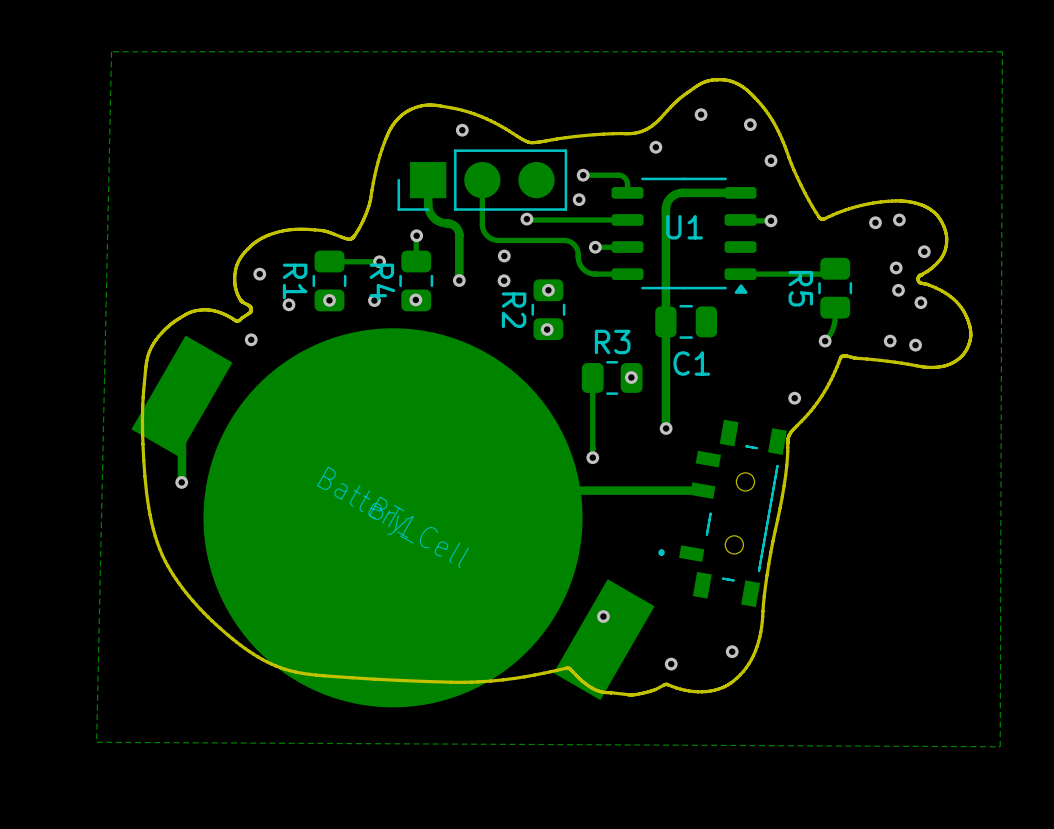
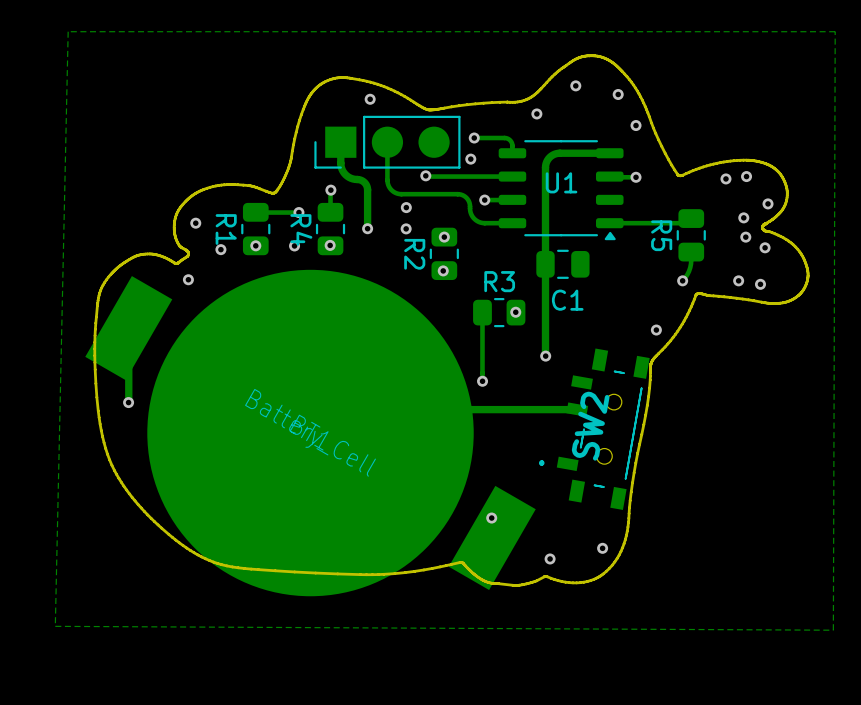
SW2 name: none -> SW2 (590, 426)

